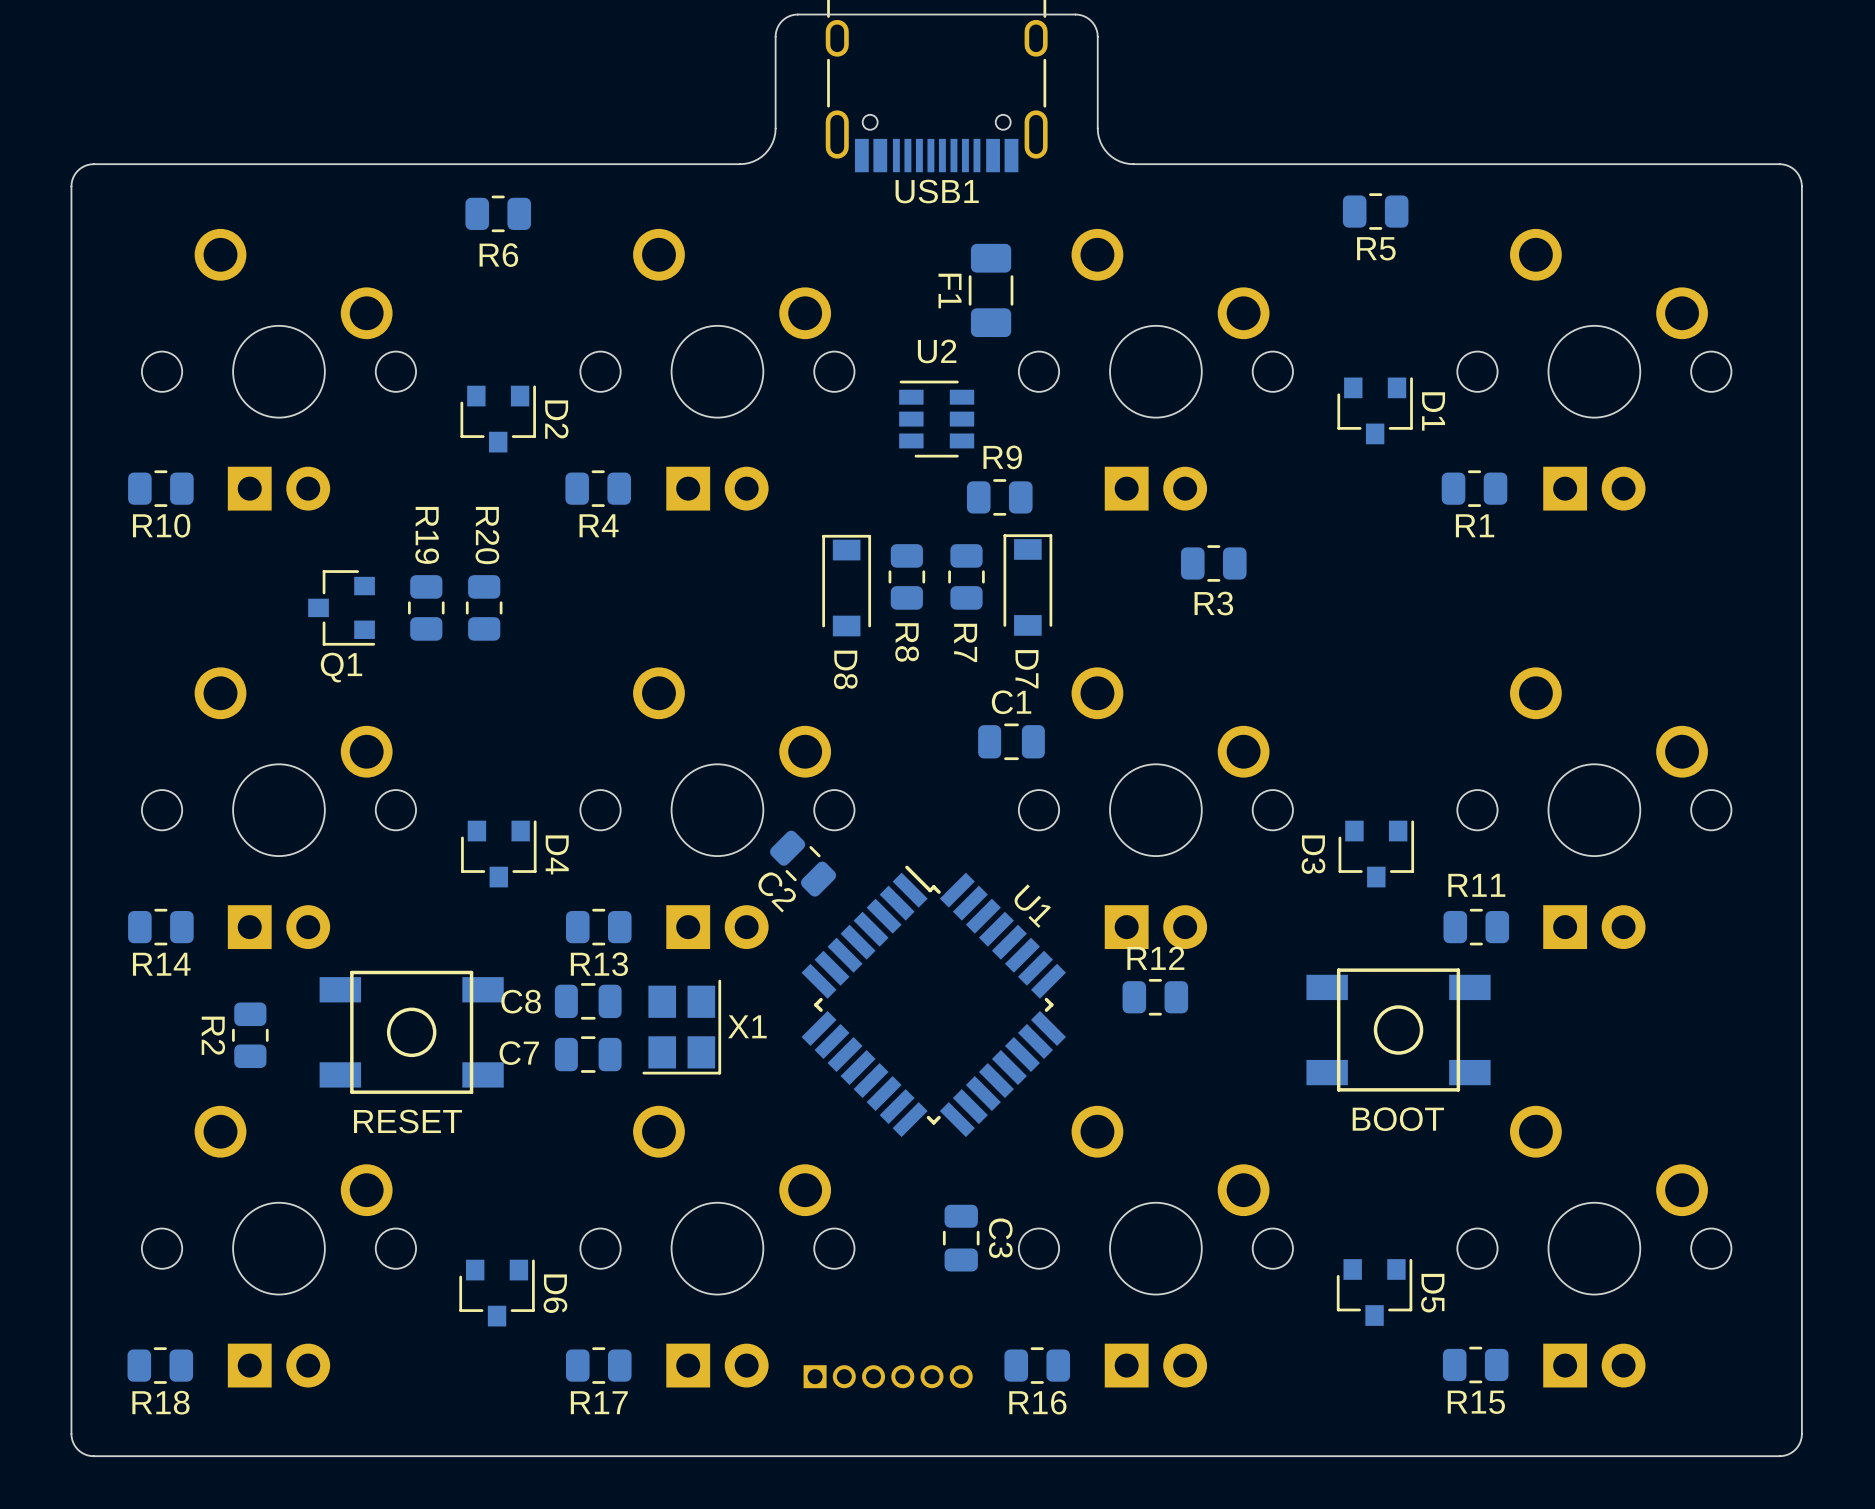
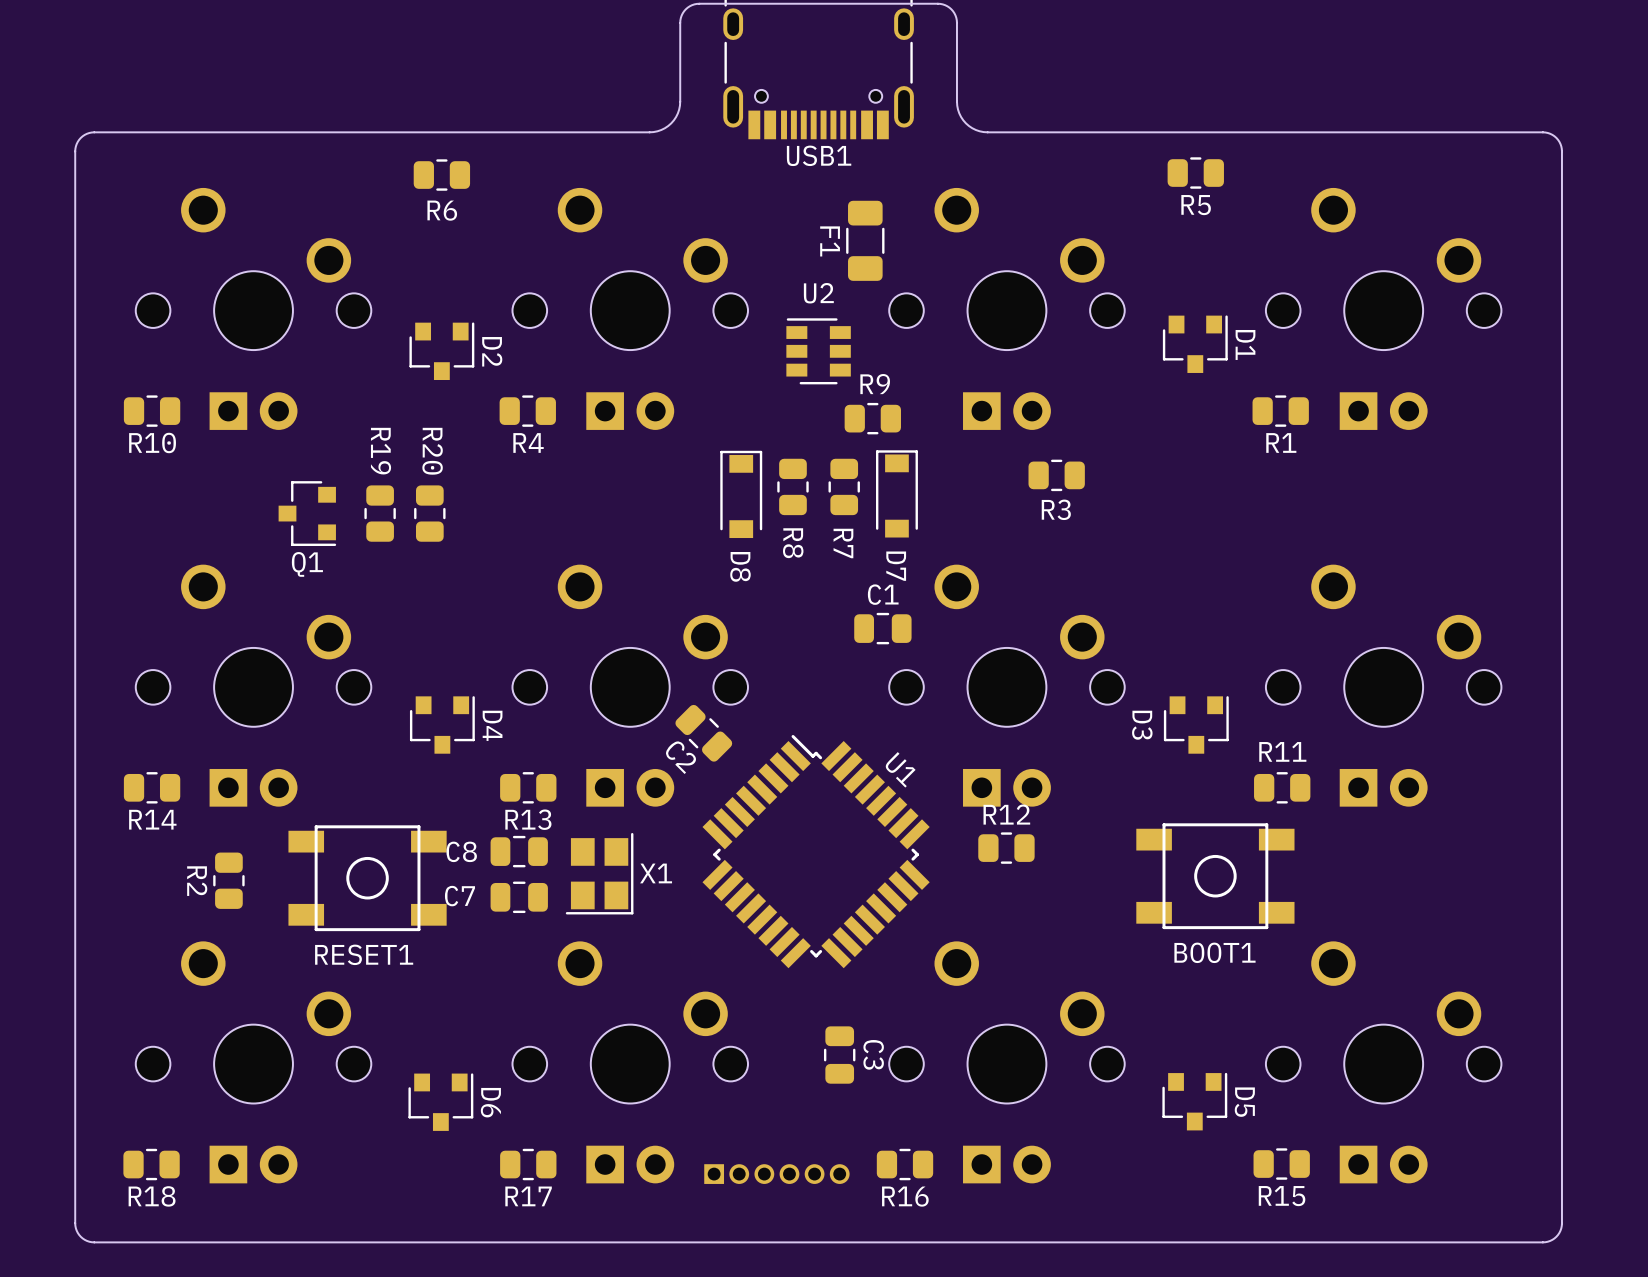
BOOT name: BOOT (1398, 1119) -> BOOT1 (1214, 952)
RESET name: RESET (408, 1121) -> RESET1 (364, 954)

